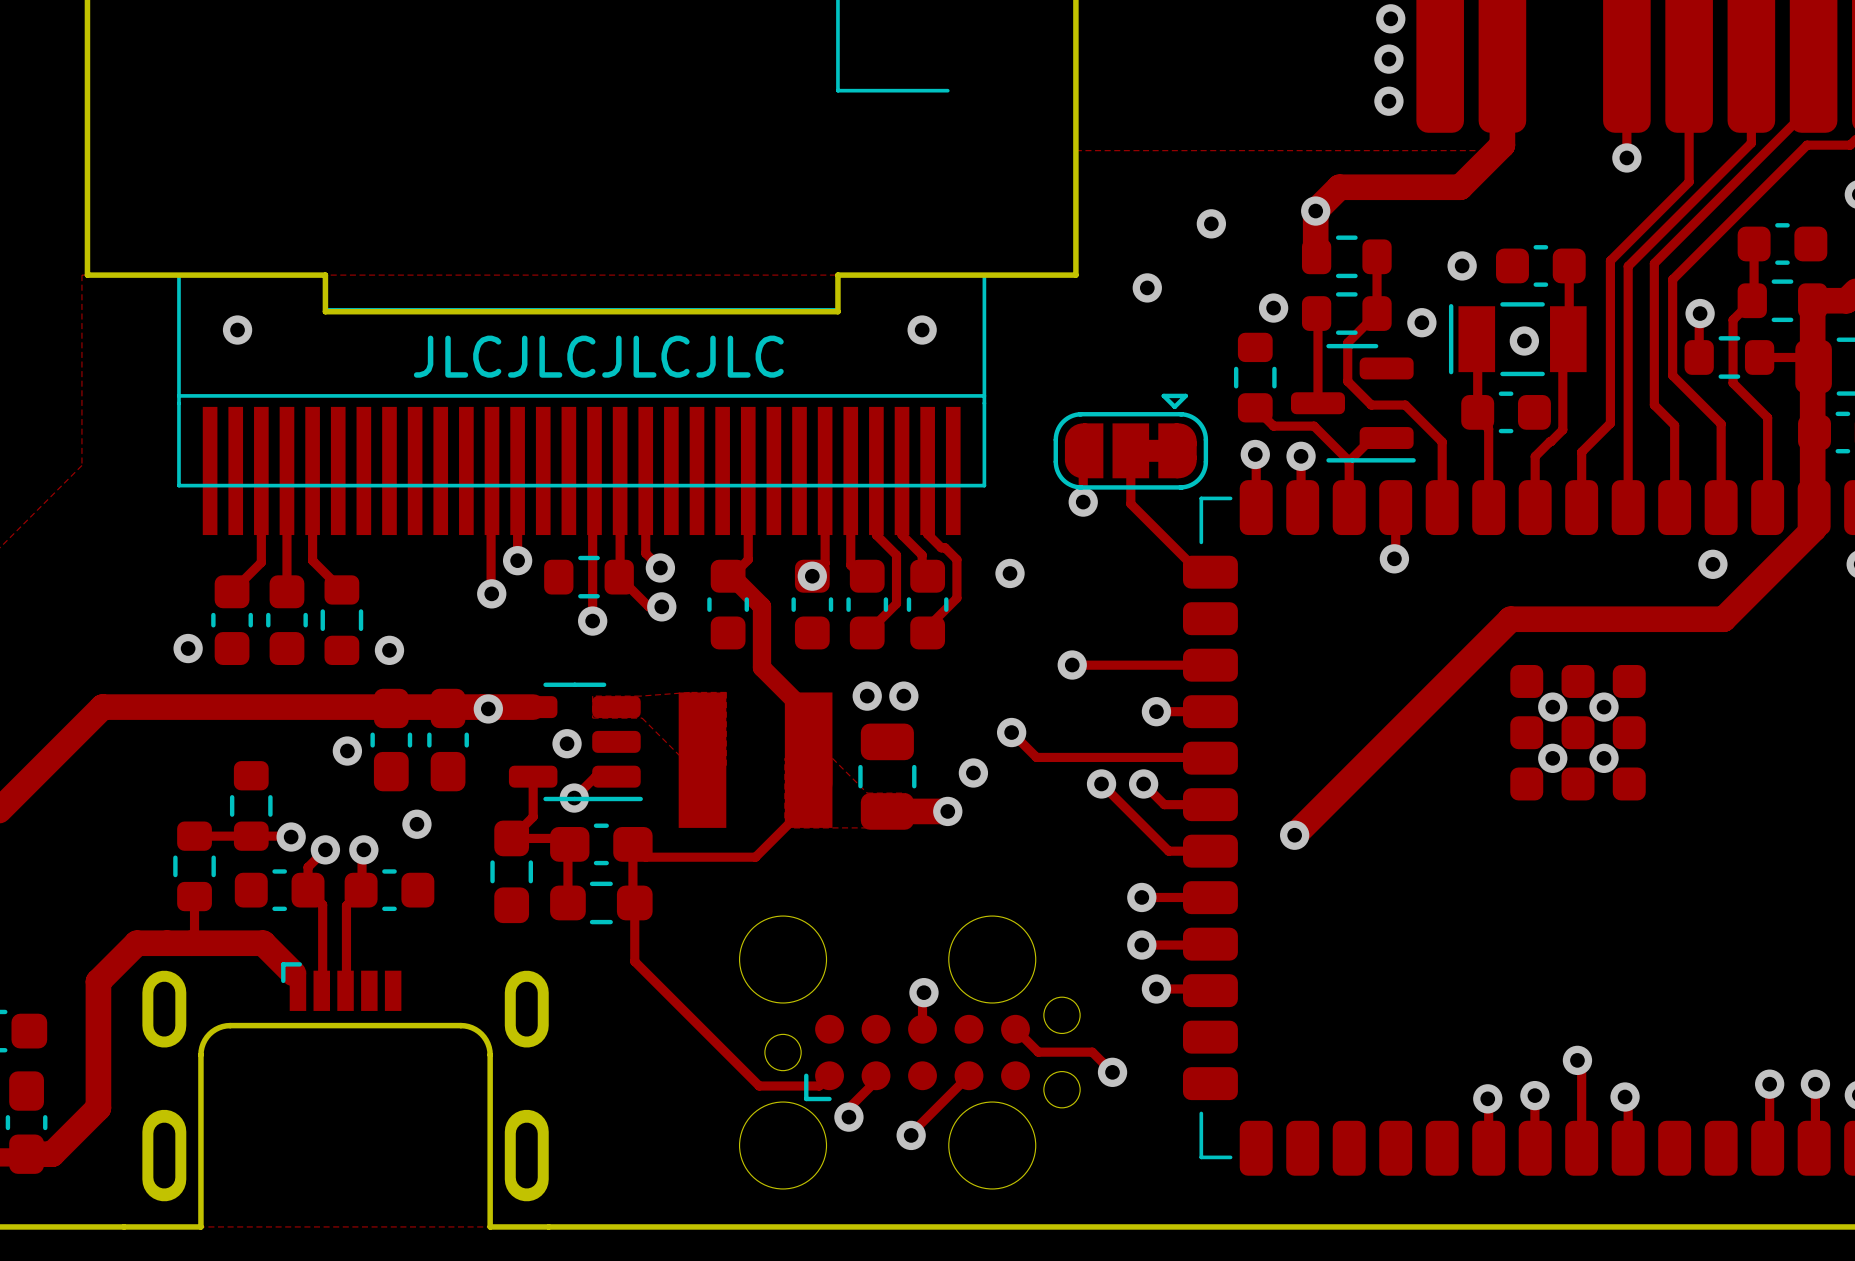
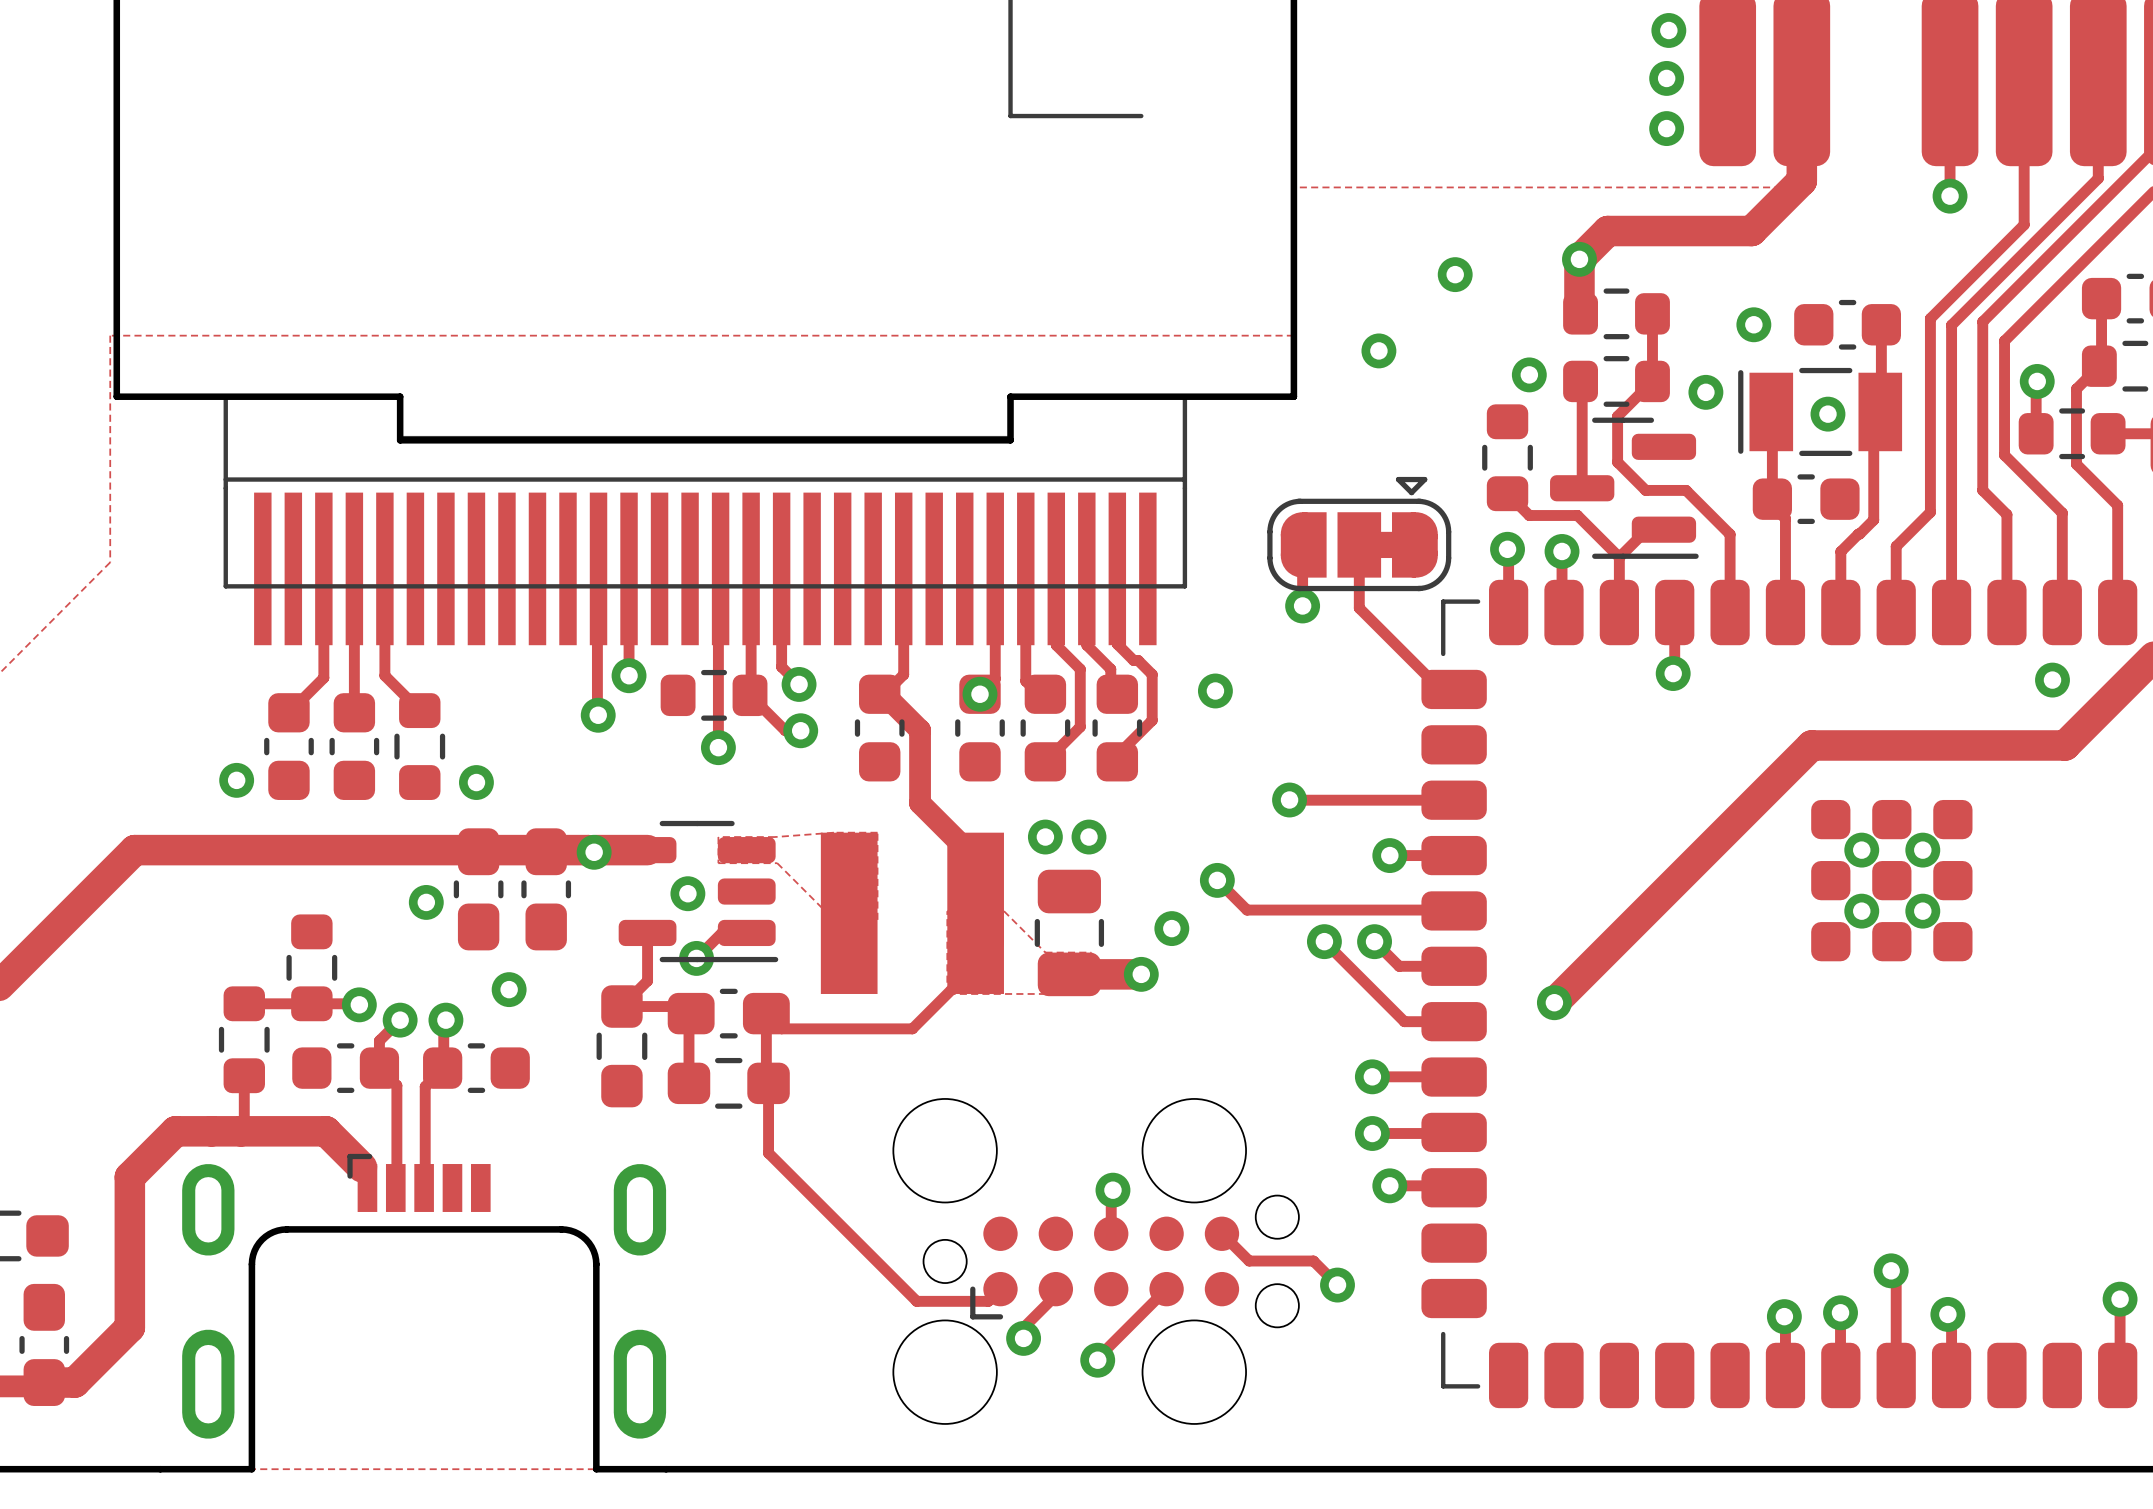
part footprint: [177, 273, 987, 536] -> [223, 394, 1188, 646]
board edge: (87, 275) (325, 275) (325, 311) (837, 311) (837, 275) (1075, 275) -> (116, 335) (116, 396) (400, 396) (400, 440) (1010, 440) (1010, 396) (1293, 396) (1293, 335)
via: (237, 330) -> none
via: (922, 330) -> none
text: JLCJLCJLCJLC (598, 356) -> none

